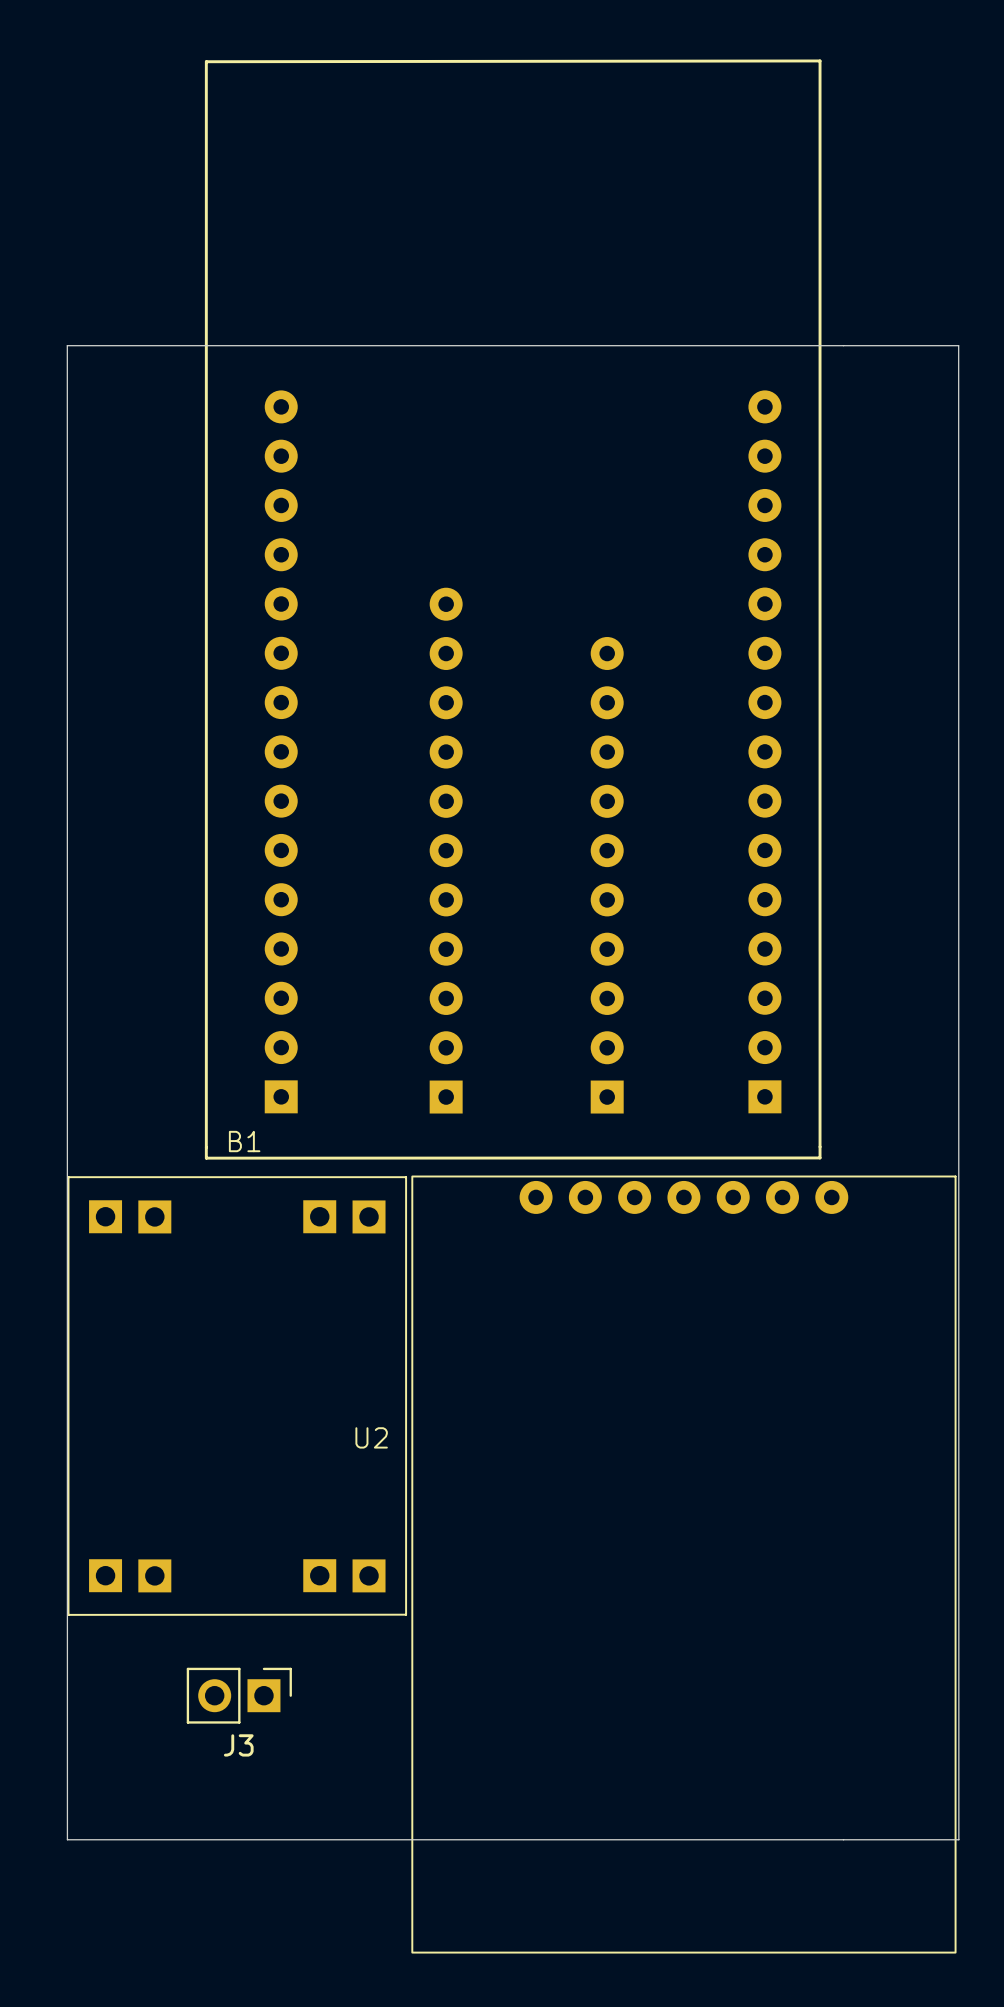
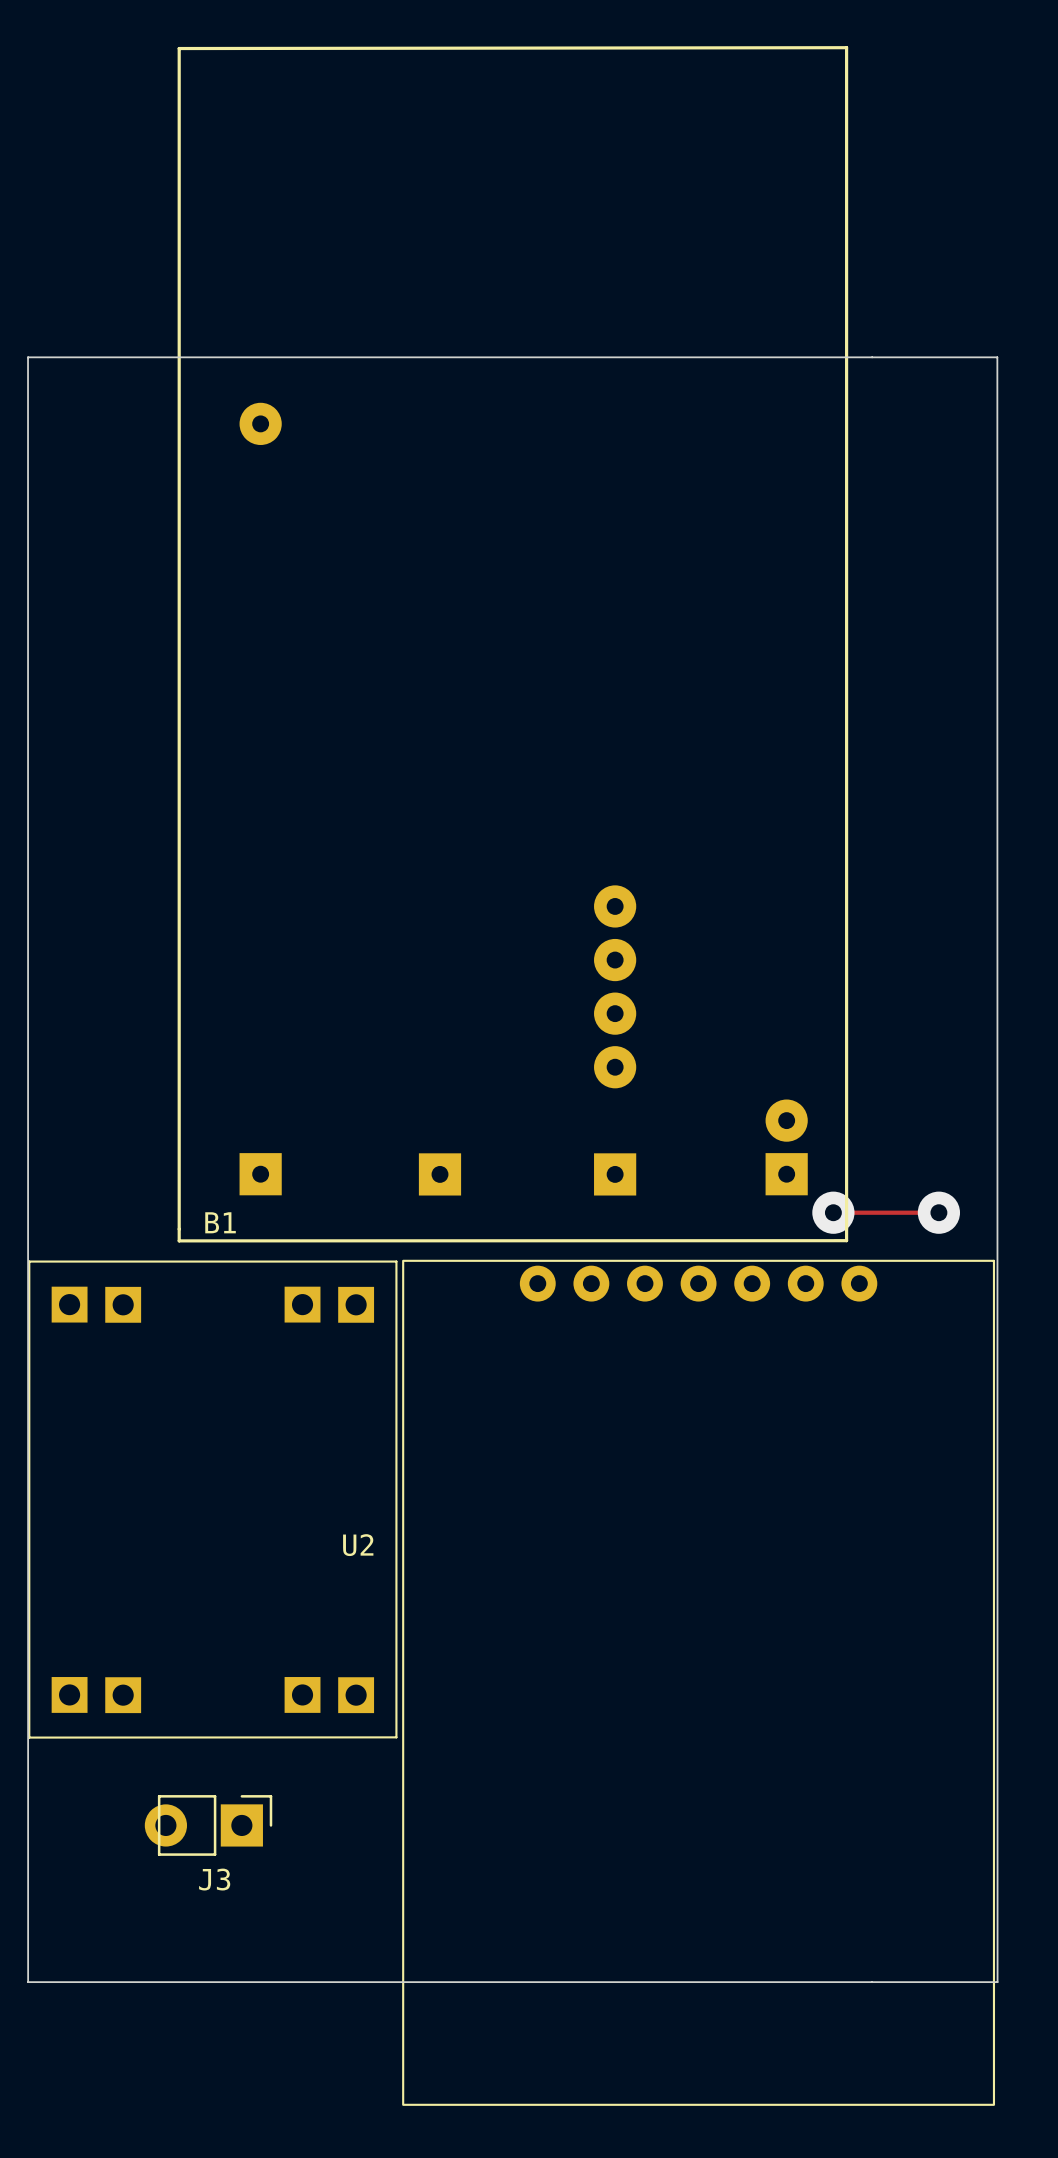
B1 footprint: [204, 59, 822, 1160] -> [177, 46, 849, 1243]
track: none -> (833, 1212) (938, 1212)
via: none -> (833, 1212)
via: none -> (938, 1212)
J3 footprint: [186, 1667, 292, 1724] -> [144, 1795, 273, 1856]

